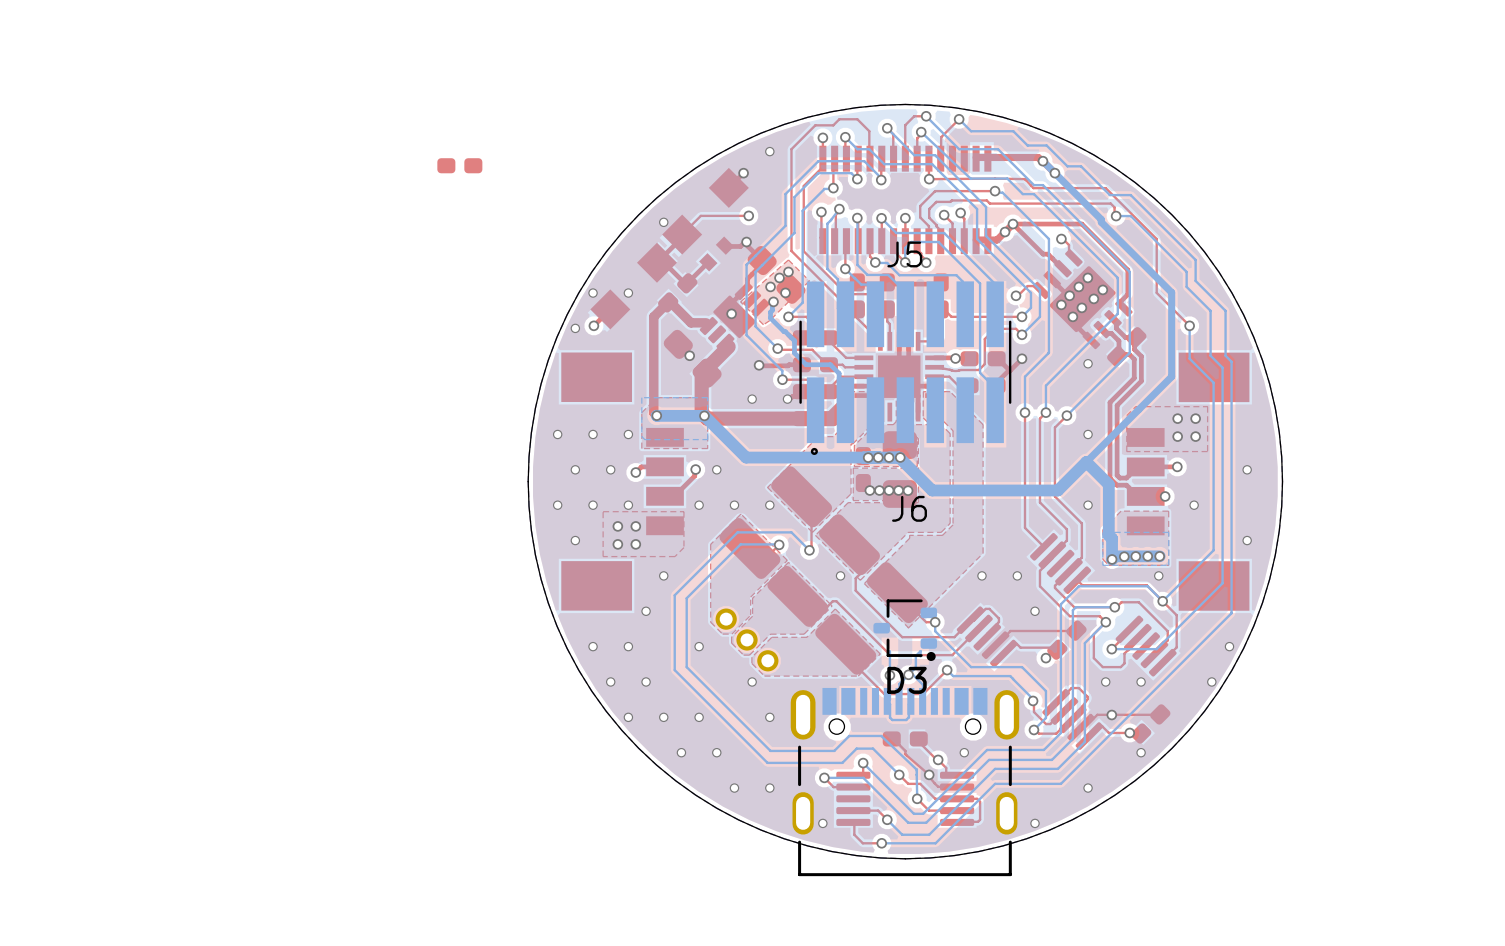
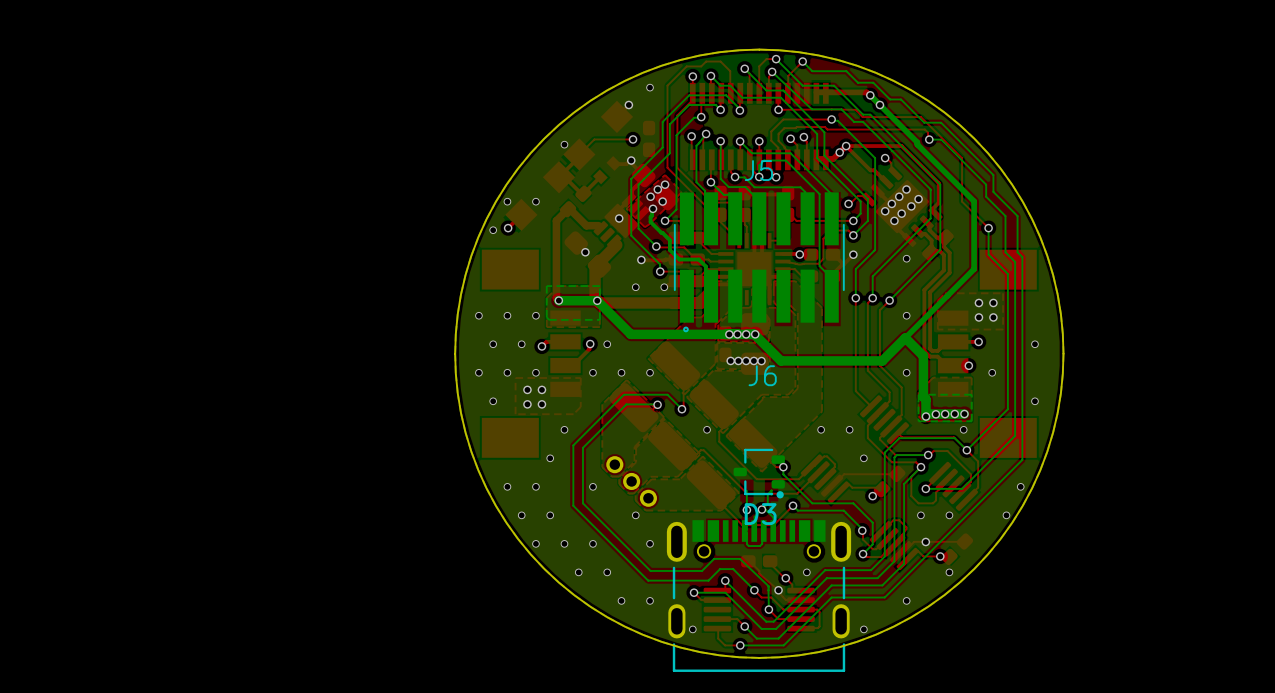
part rotation: 0° (459, 165) -> 90° clockwise (649, 138)
part position: (459, 165) -> (649, 138)

